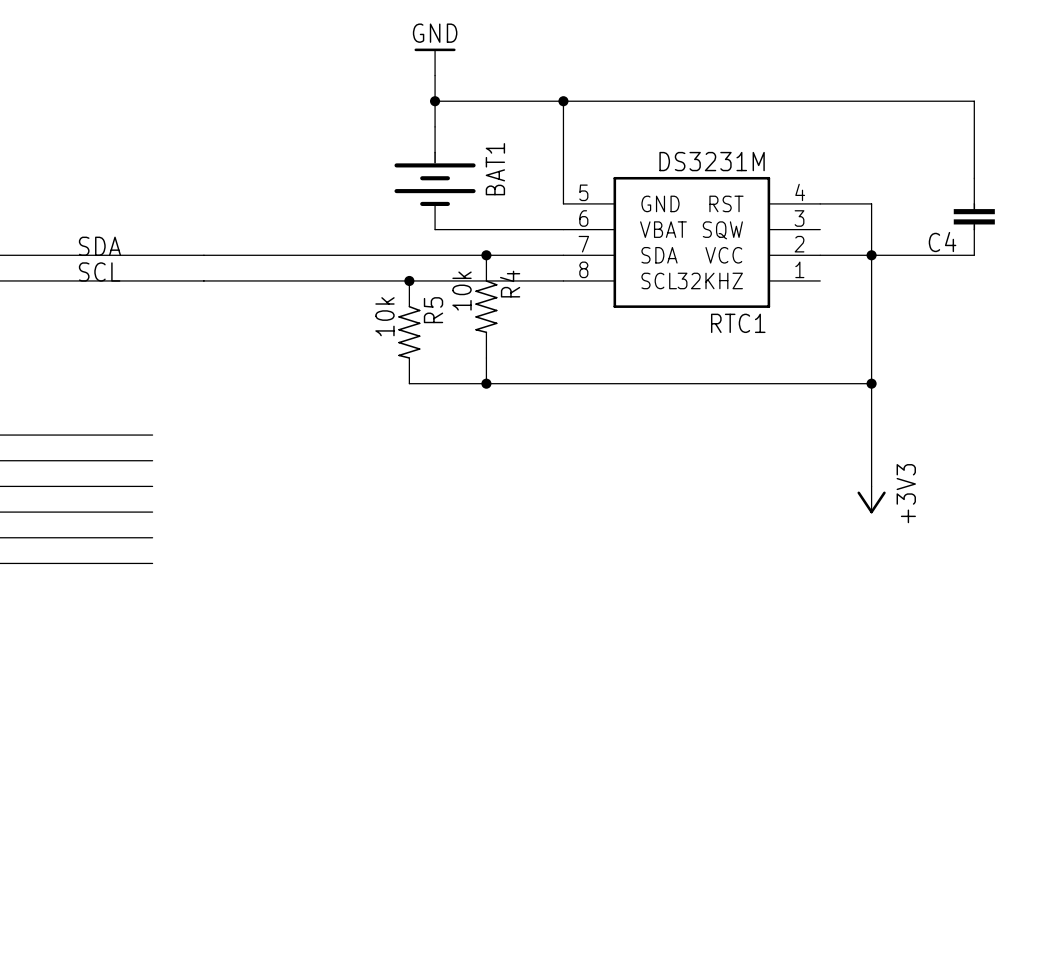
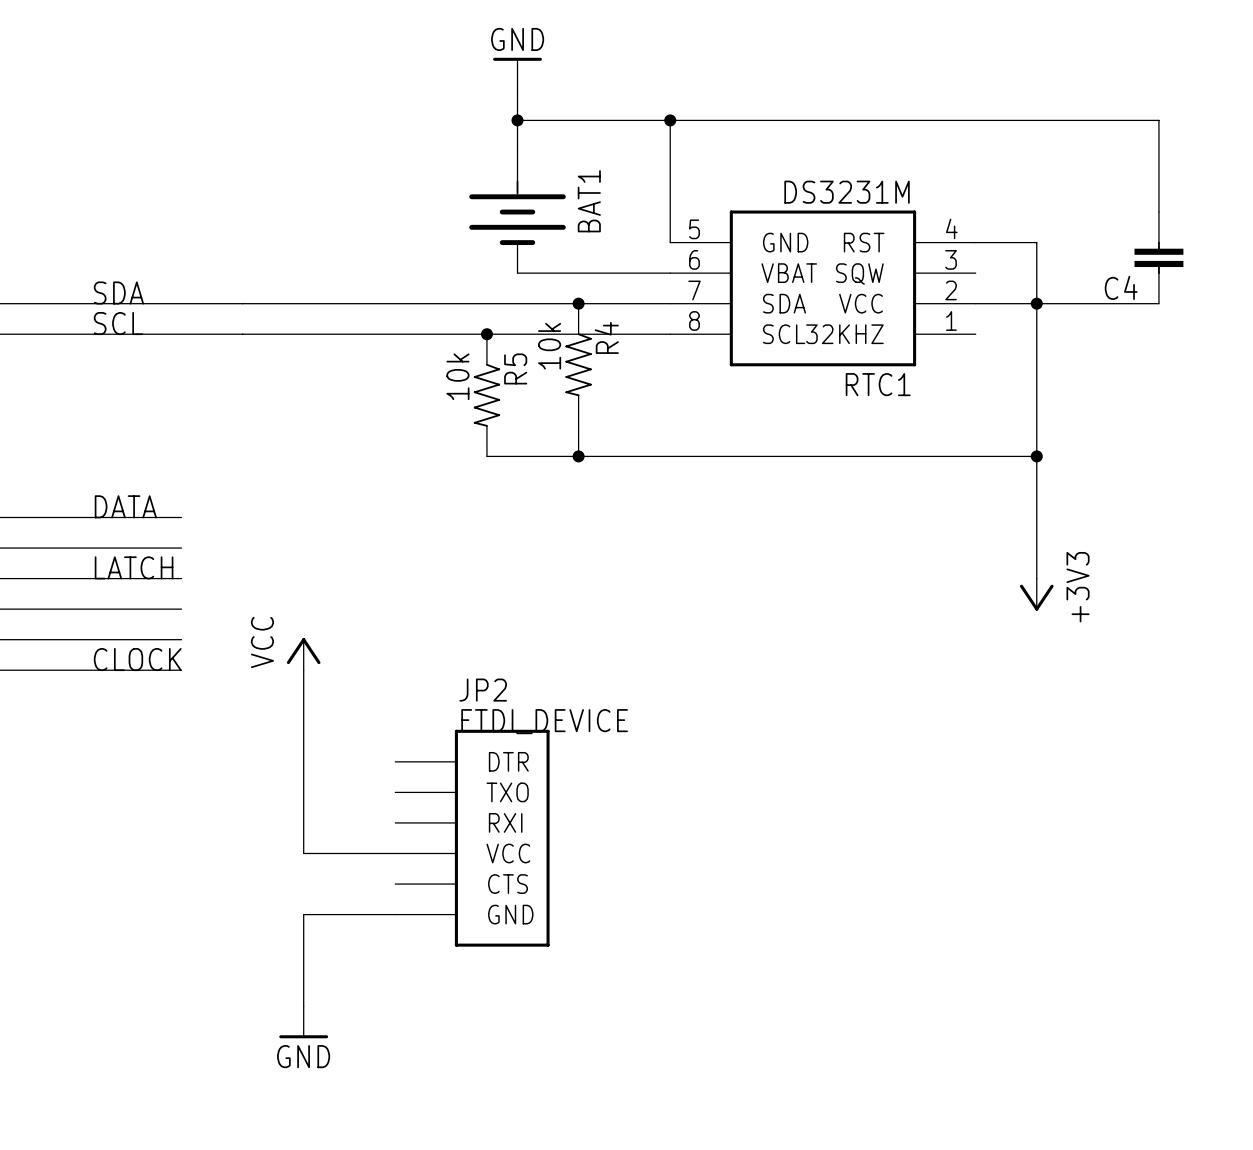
label: none -> DATA (125, 506)
label: none -> LATCH (134, 567)
power symbol: none -> VCC (303, 654)
label: none -> CLOCK (137, 659)
wire: none -> (303, 670) (303, 853) (395, 853)
JP2: none -> FTDI_DEVICE (472, 838)
wire: none -> (395, 914) (303, 914) (303, 1006)
power symbol: none -> GND (303, 1022)

